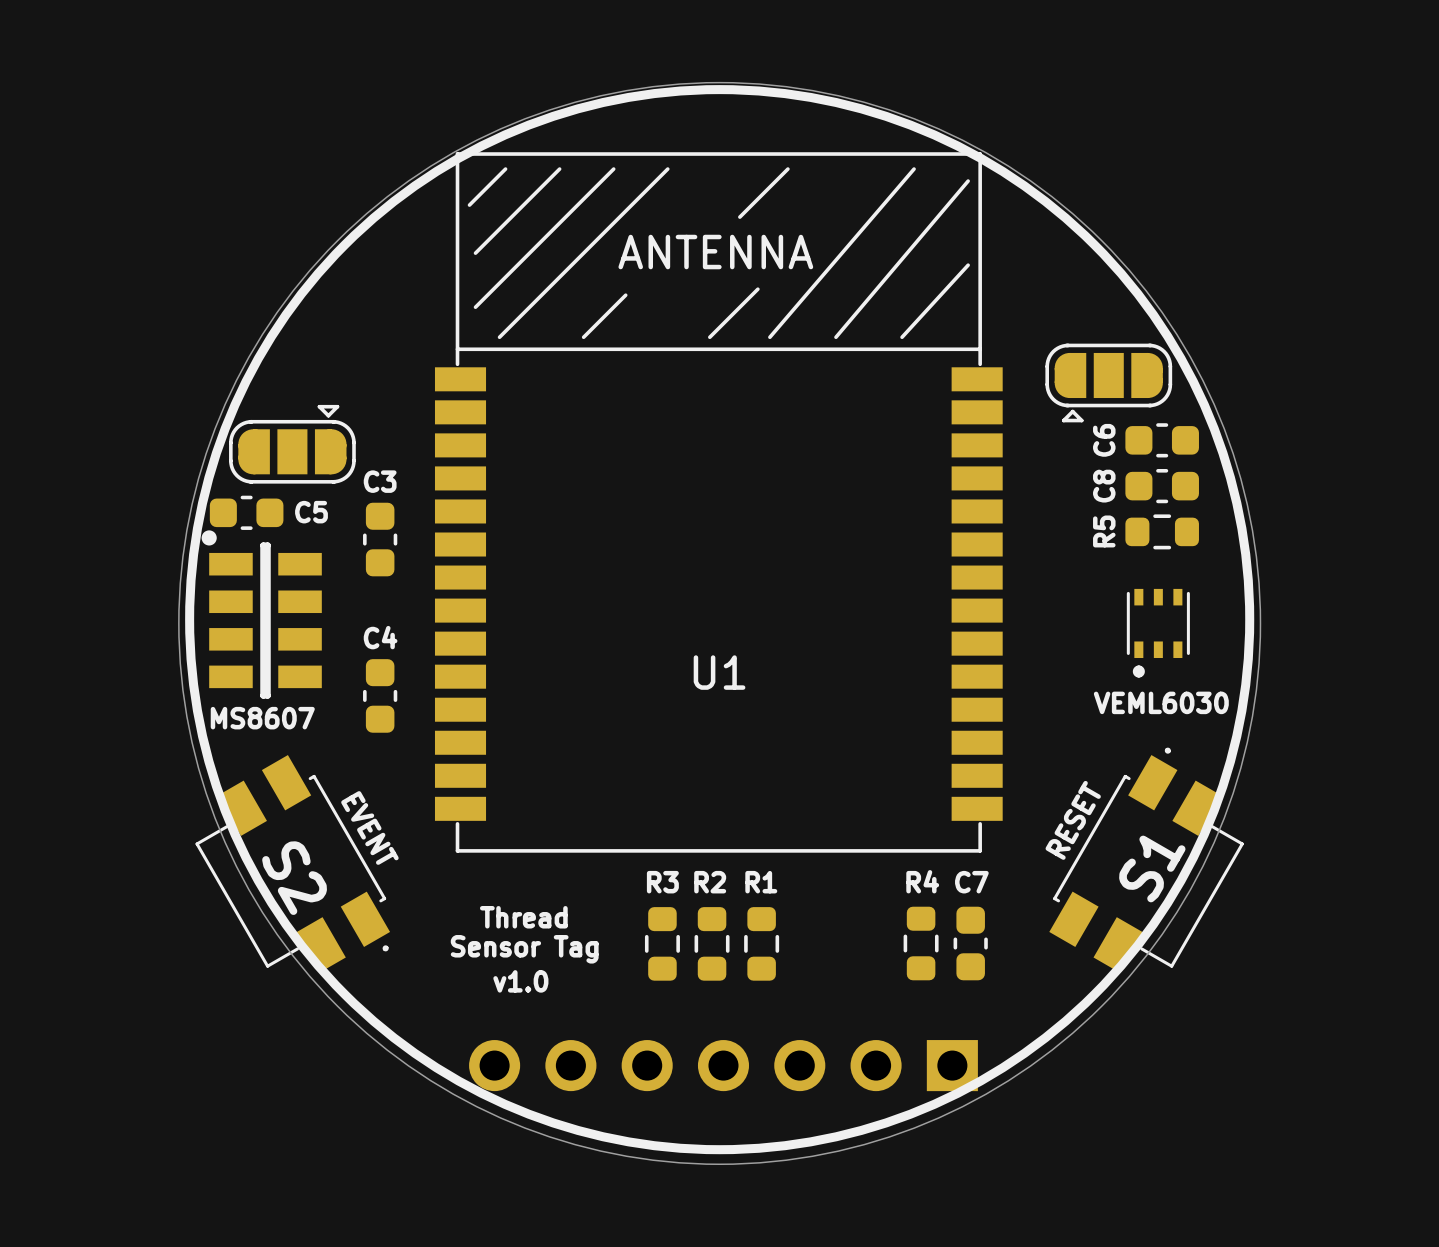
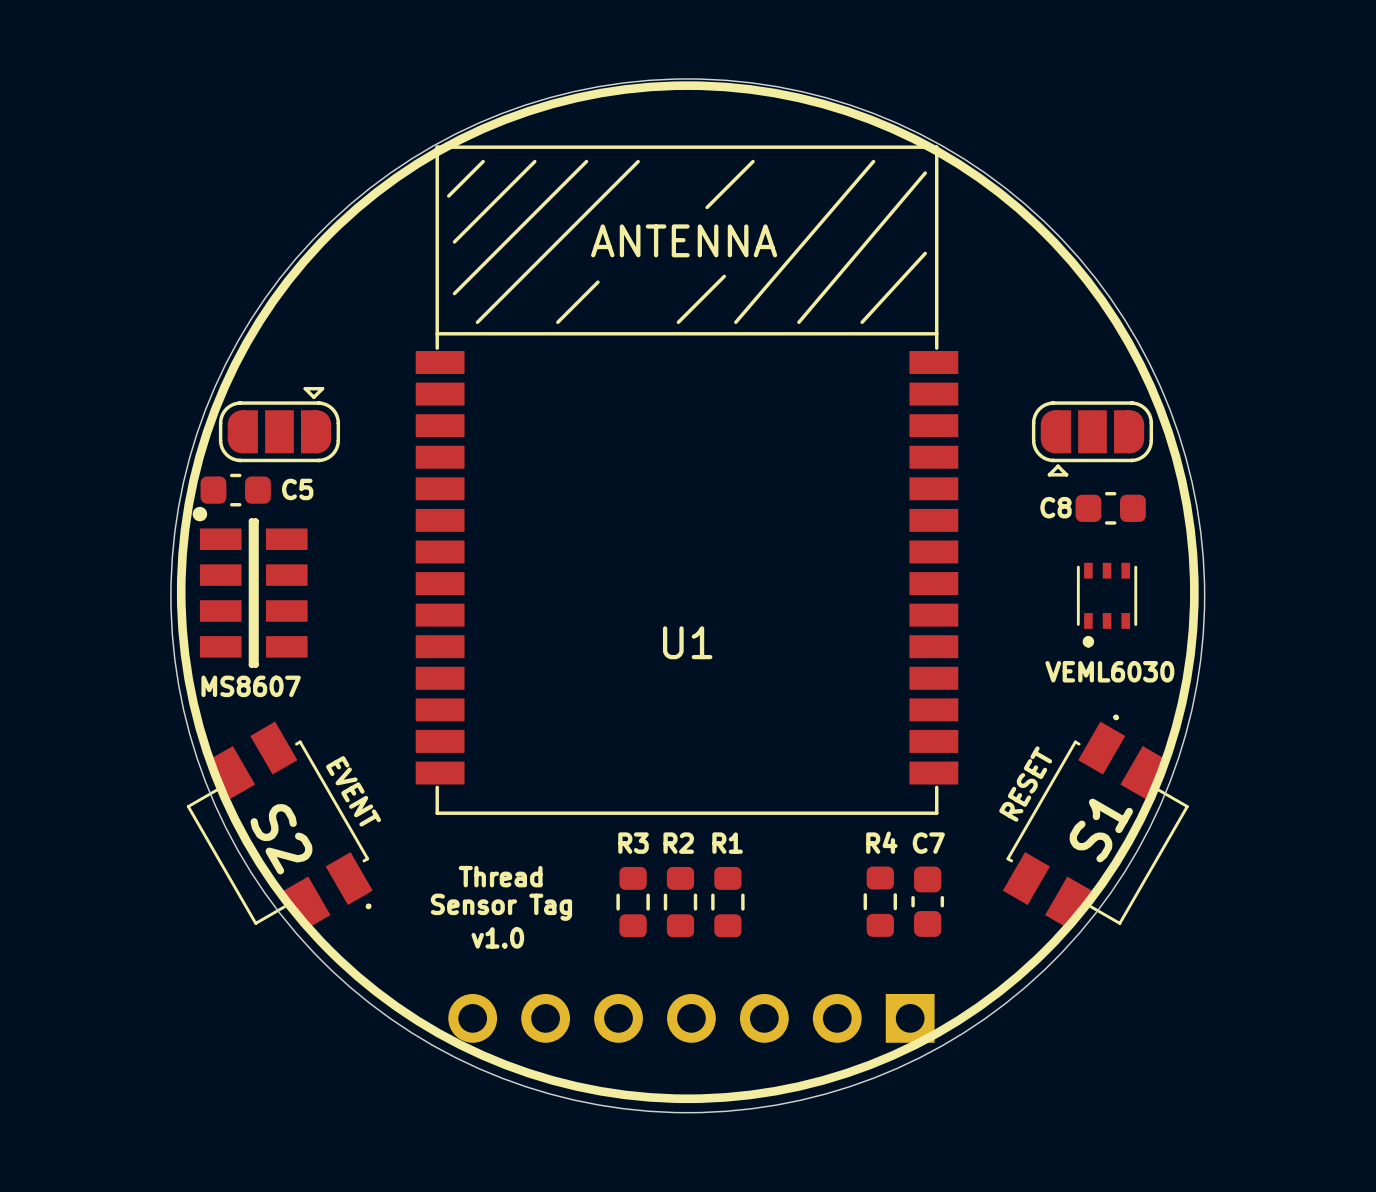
part position: (1108, 383) -> (1092, 438)
C6: (1162, 440) -> none
C8 name rotation: 0° (1104, 486) -> 90° clockwise (1056, 507)
C8 position: (1162, 486) -> (1110, 508)
R5: (1162, 531) -> none
C3: (380, 539) -> none
C4: (380, 695) -> none

